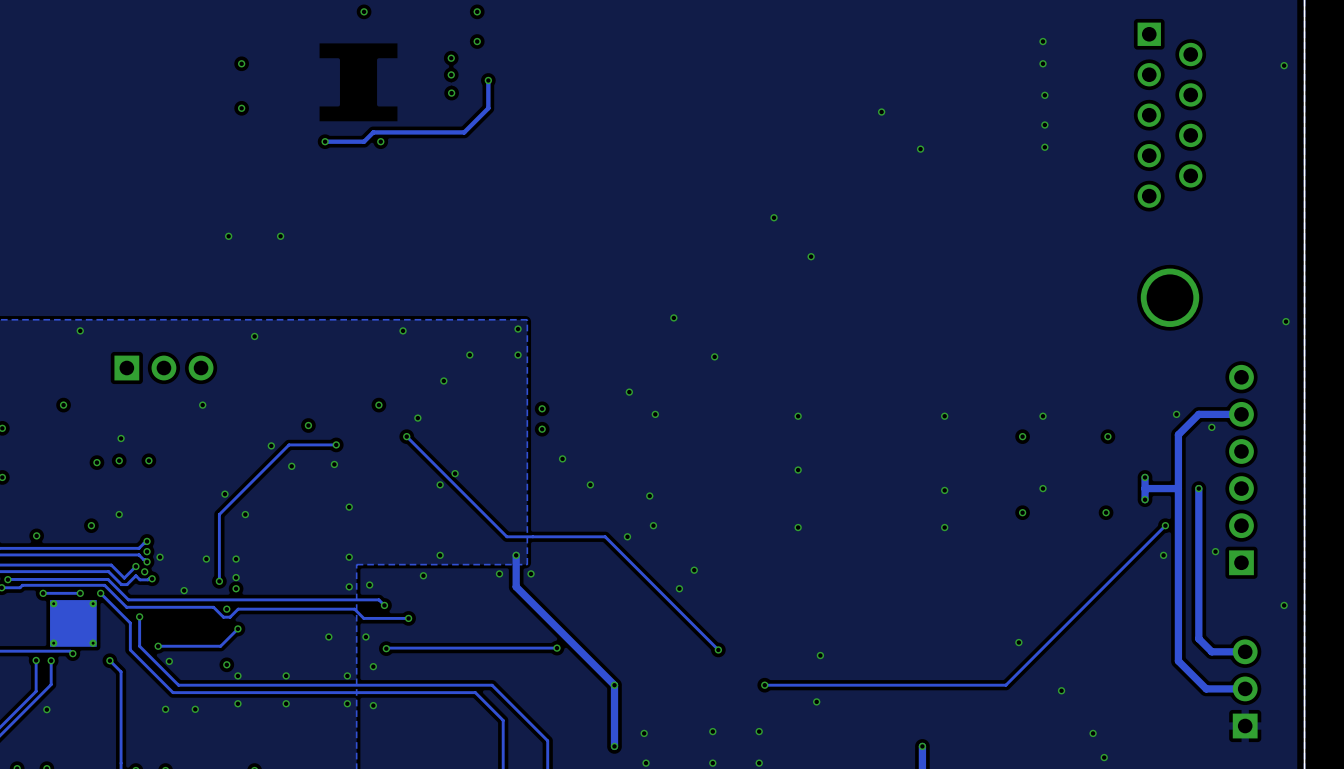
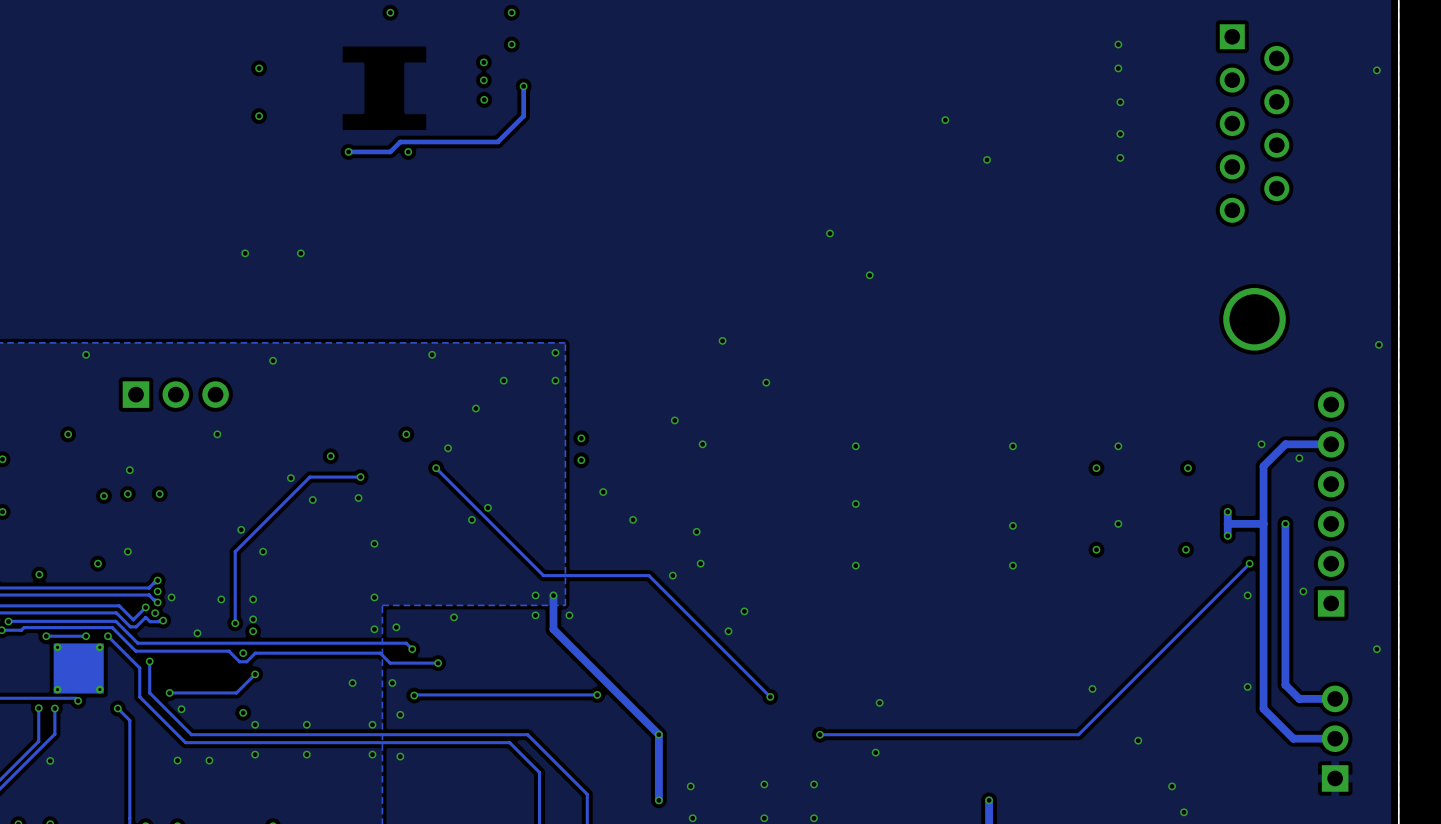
via position: (440, 555) -> (535, 595)
via: none -> (1247, 686)

